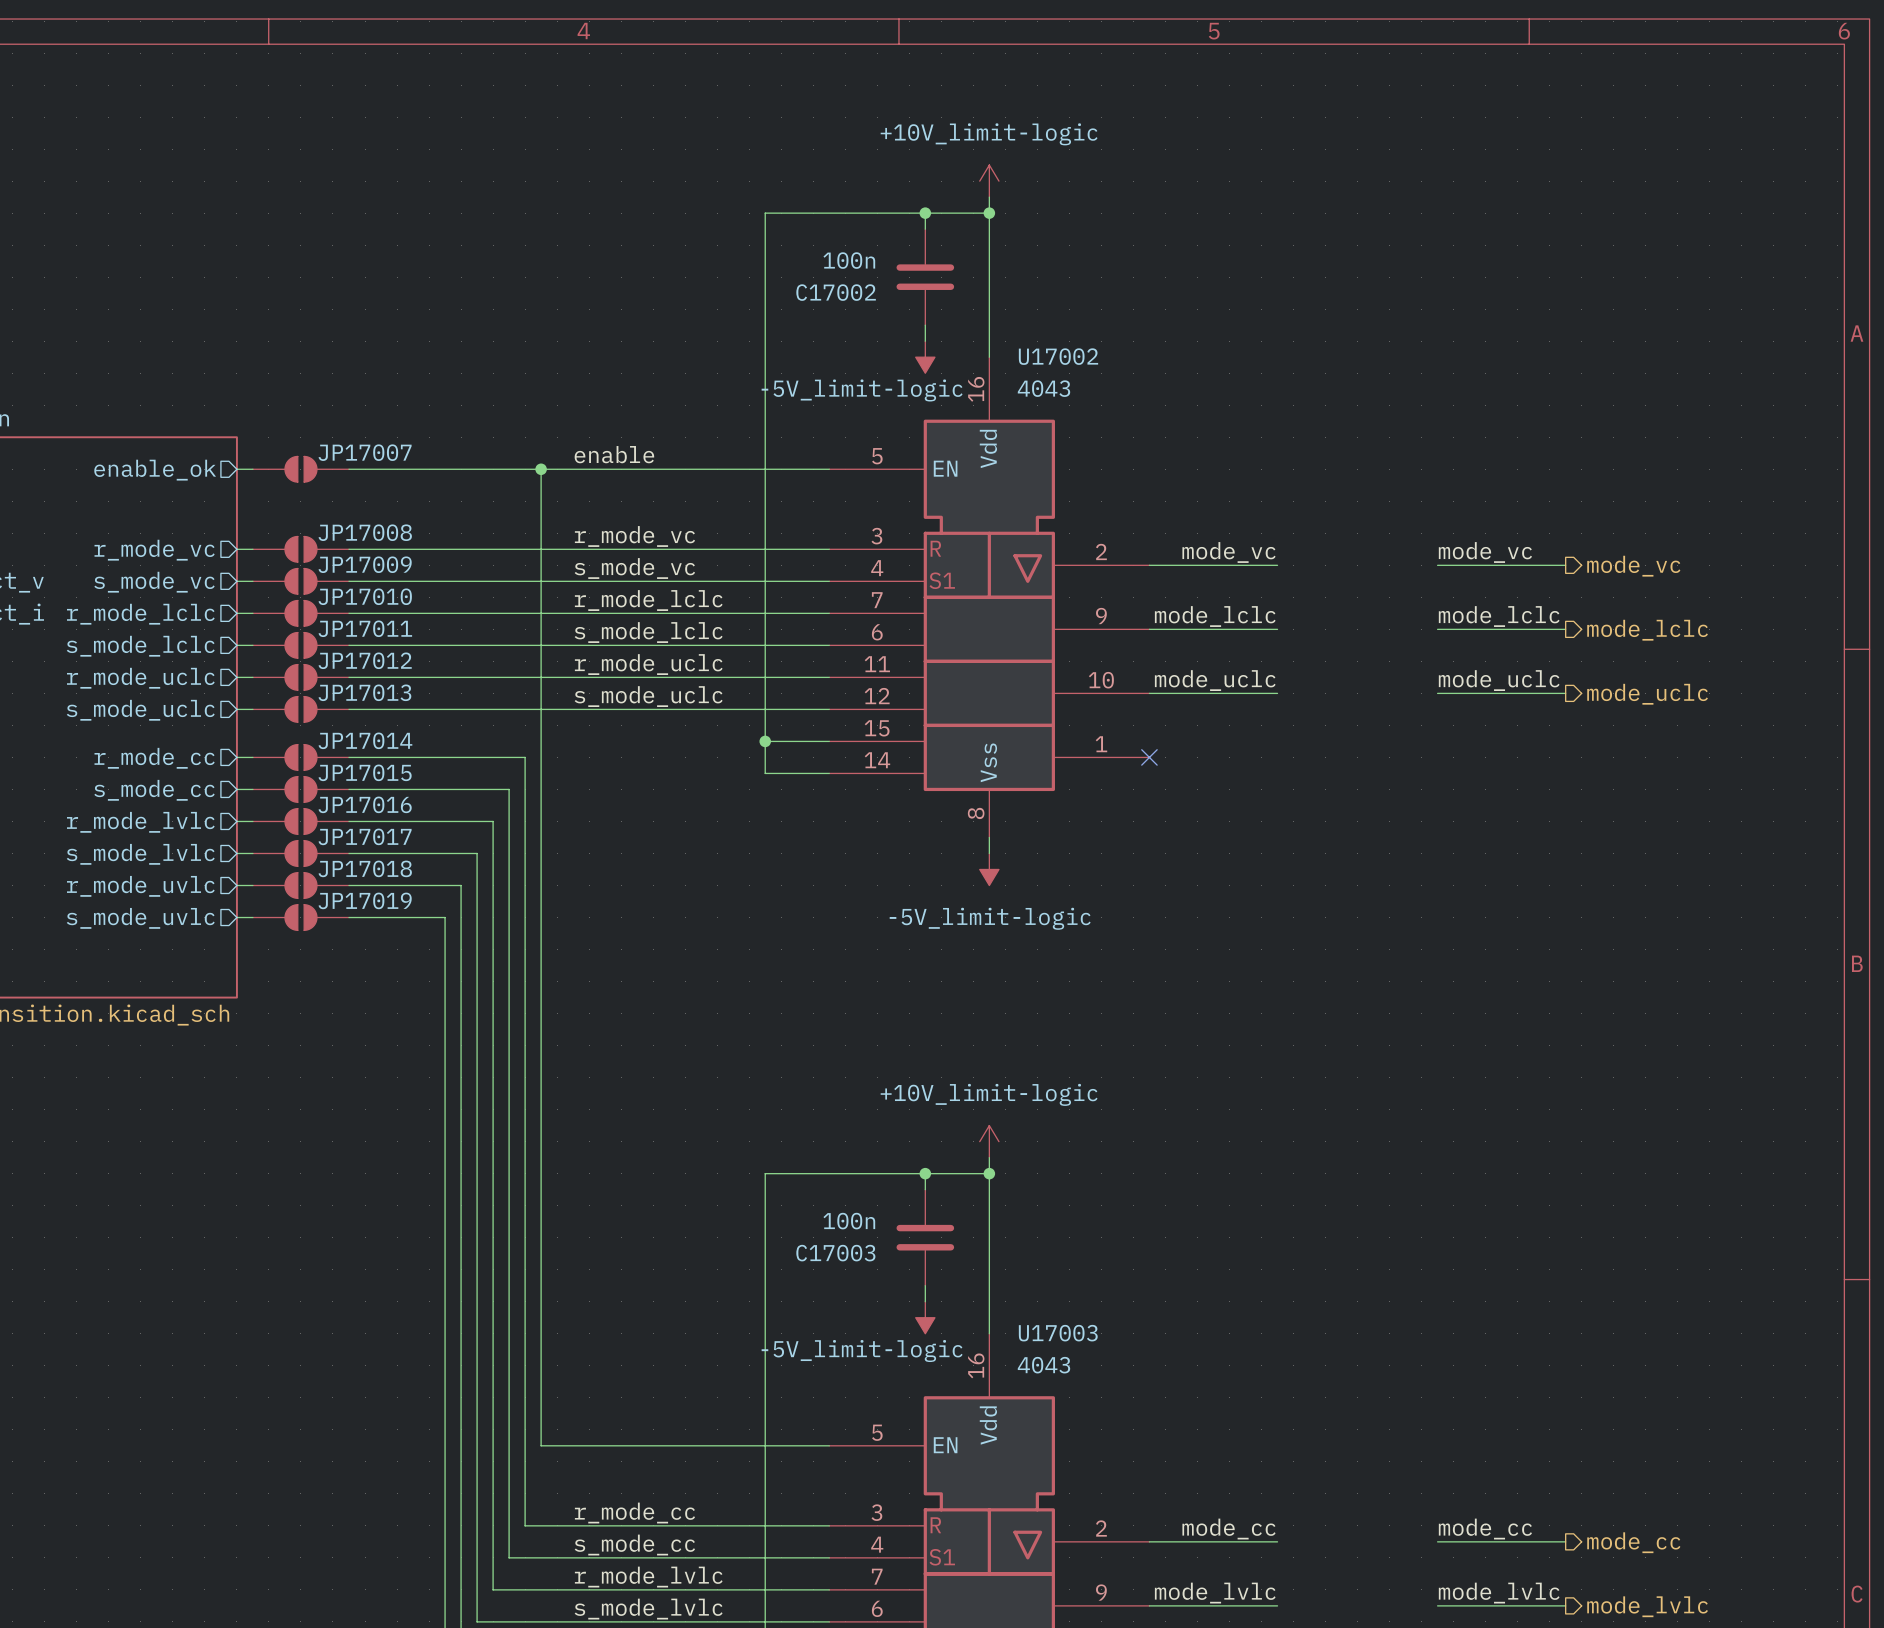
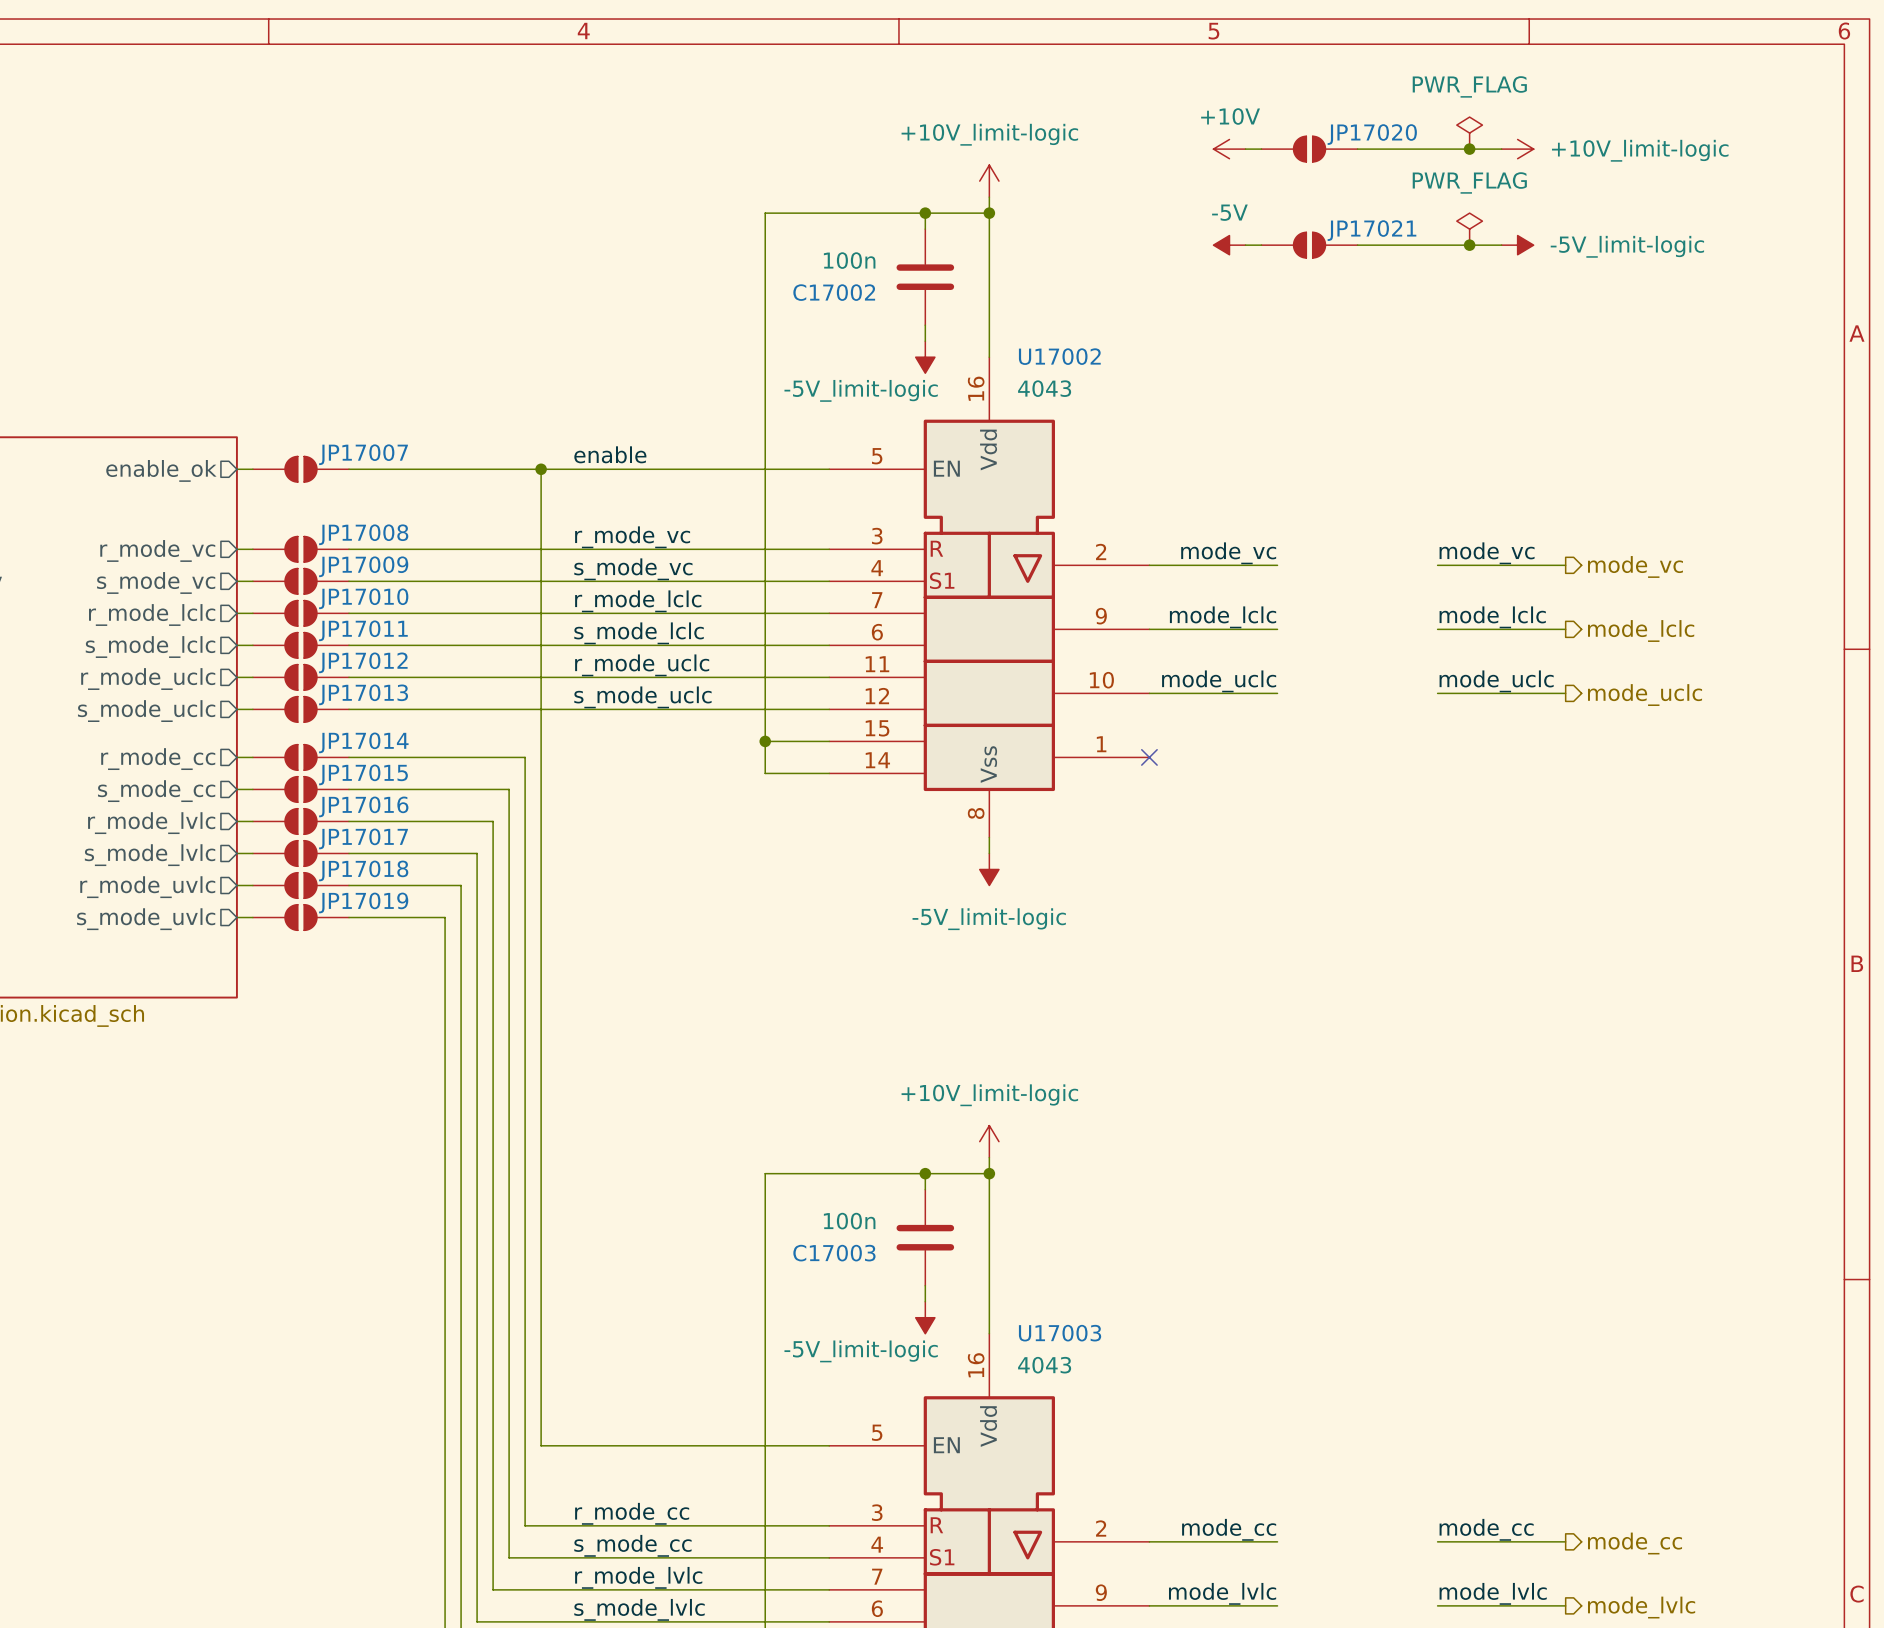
power symbol: none -> PWR_FLAG (1469, 133)
power symbol: none -> +10V (1229, 149)
wire: none -> (1245, 149) (1261, 149)
JP17020: none -> (1309, 149)
wire: none -> (1357, 149) (1501, 149)
junction: none -> (1469, 149)
power symbol: none -> +10V_limit-logic (1517, 149)
power symbol: none -> PWR_FLAG (1469, 229)
power symbol: none -> -5V (1229, 245)
wire: none -> (1245, 245) (1261, 245)
JP17021: none -> (1309, 245)
wire: none -> (1357, 245) (1501, 245)
junction: none -> (1469, 245)
power symbol: none -> -5V_limit-logic (1517, 245)

